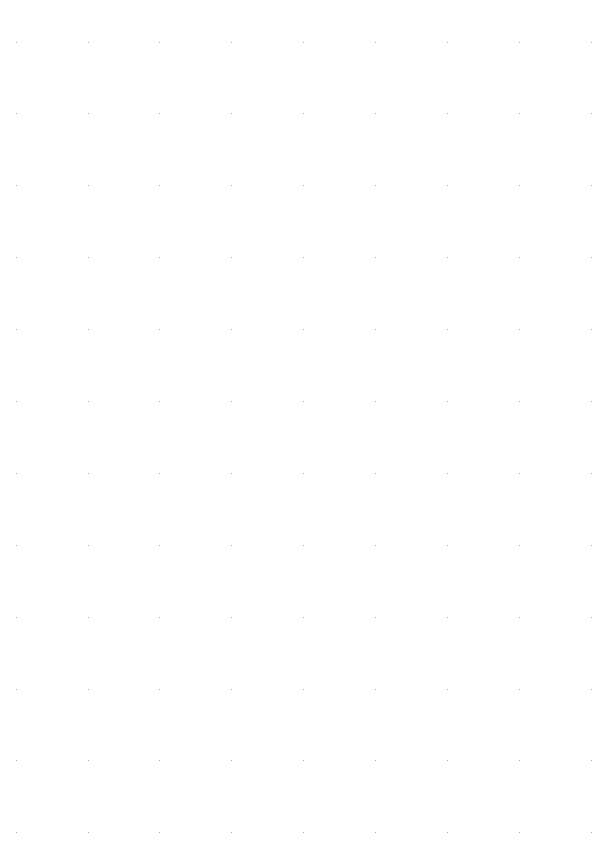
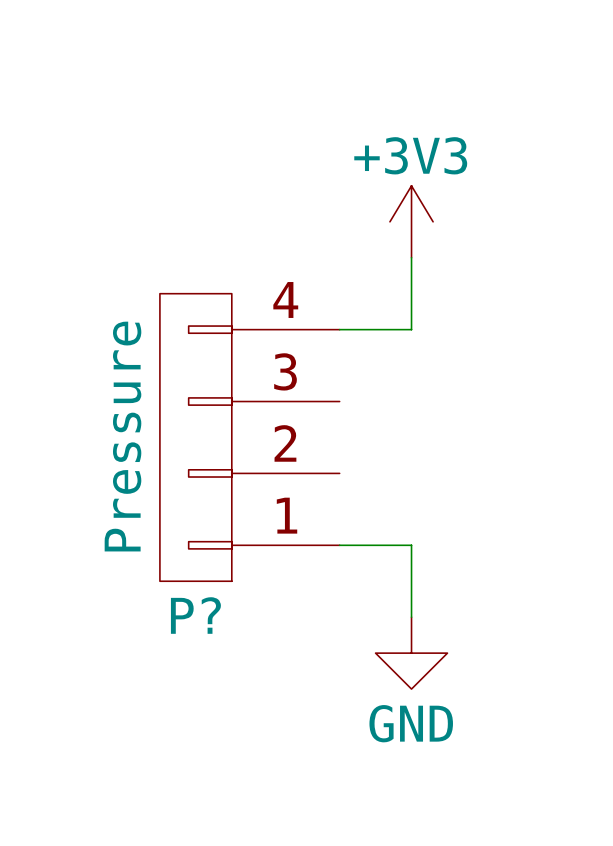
power symbol: none -> +3V3 (411, 221)
wire: none -> (411, 257) (411, 329) (339, 329)
P?: none -> Pressure (249, 437)
wire: none -> (339, 545) (411, 545) (411, 617)
power symbol: none -> GND (411, 653)

